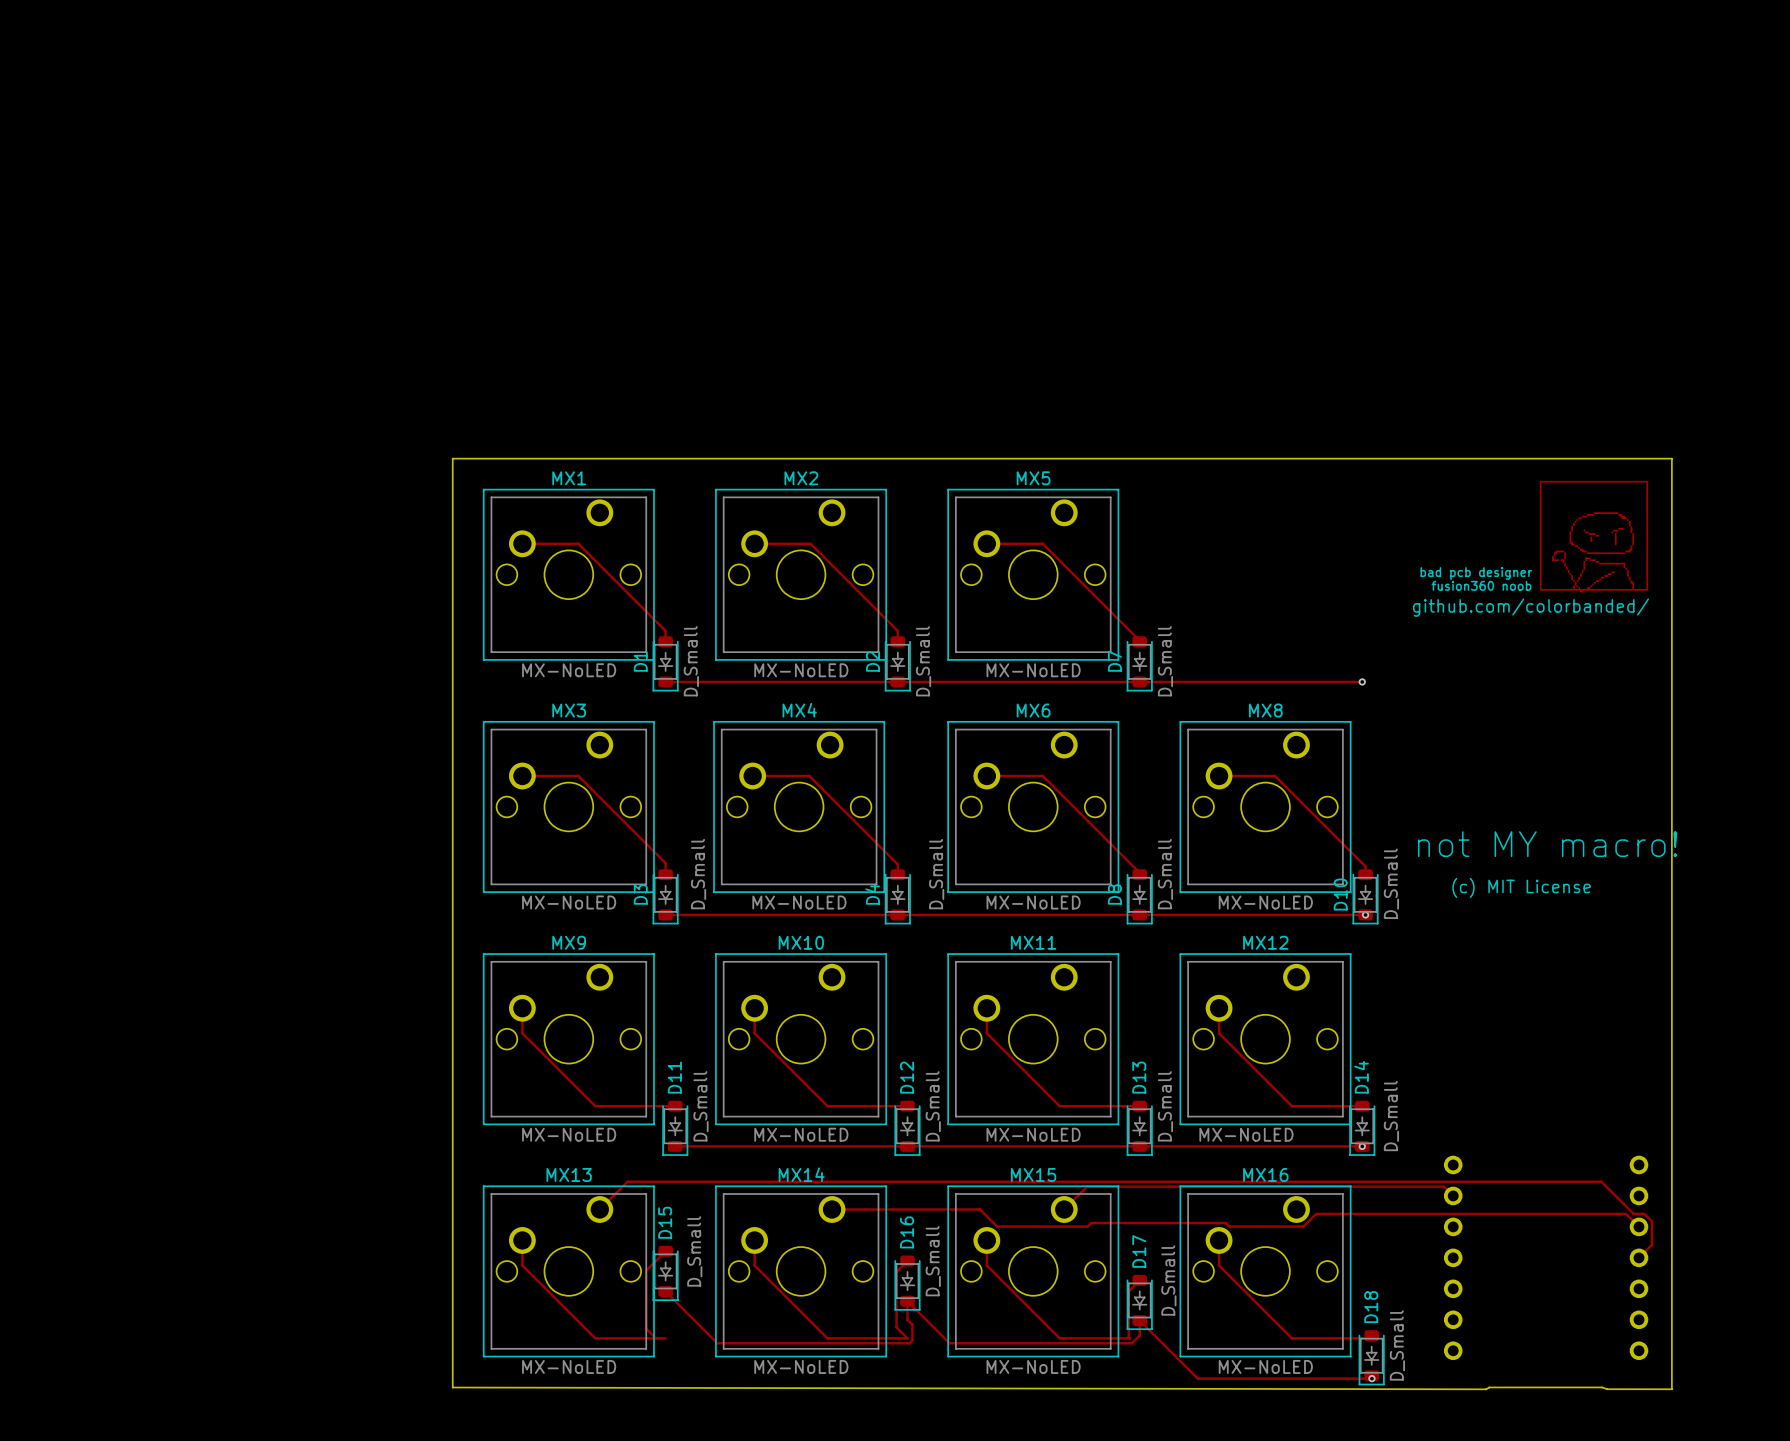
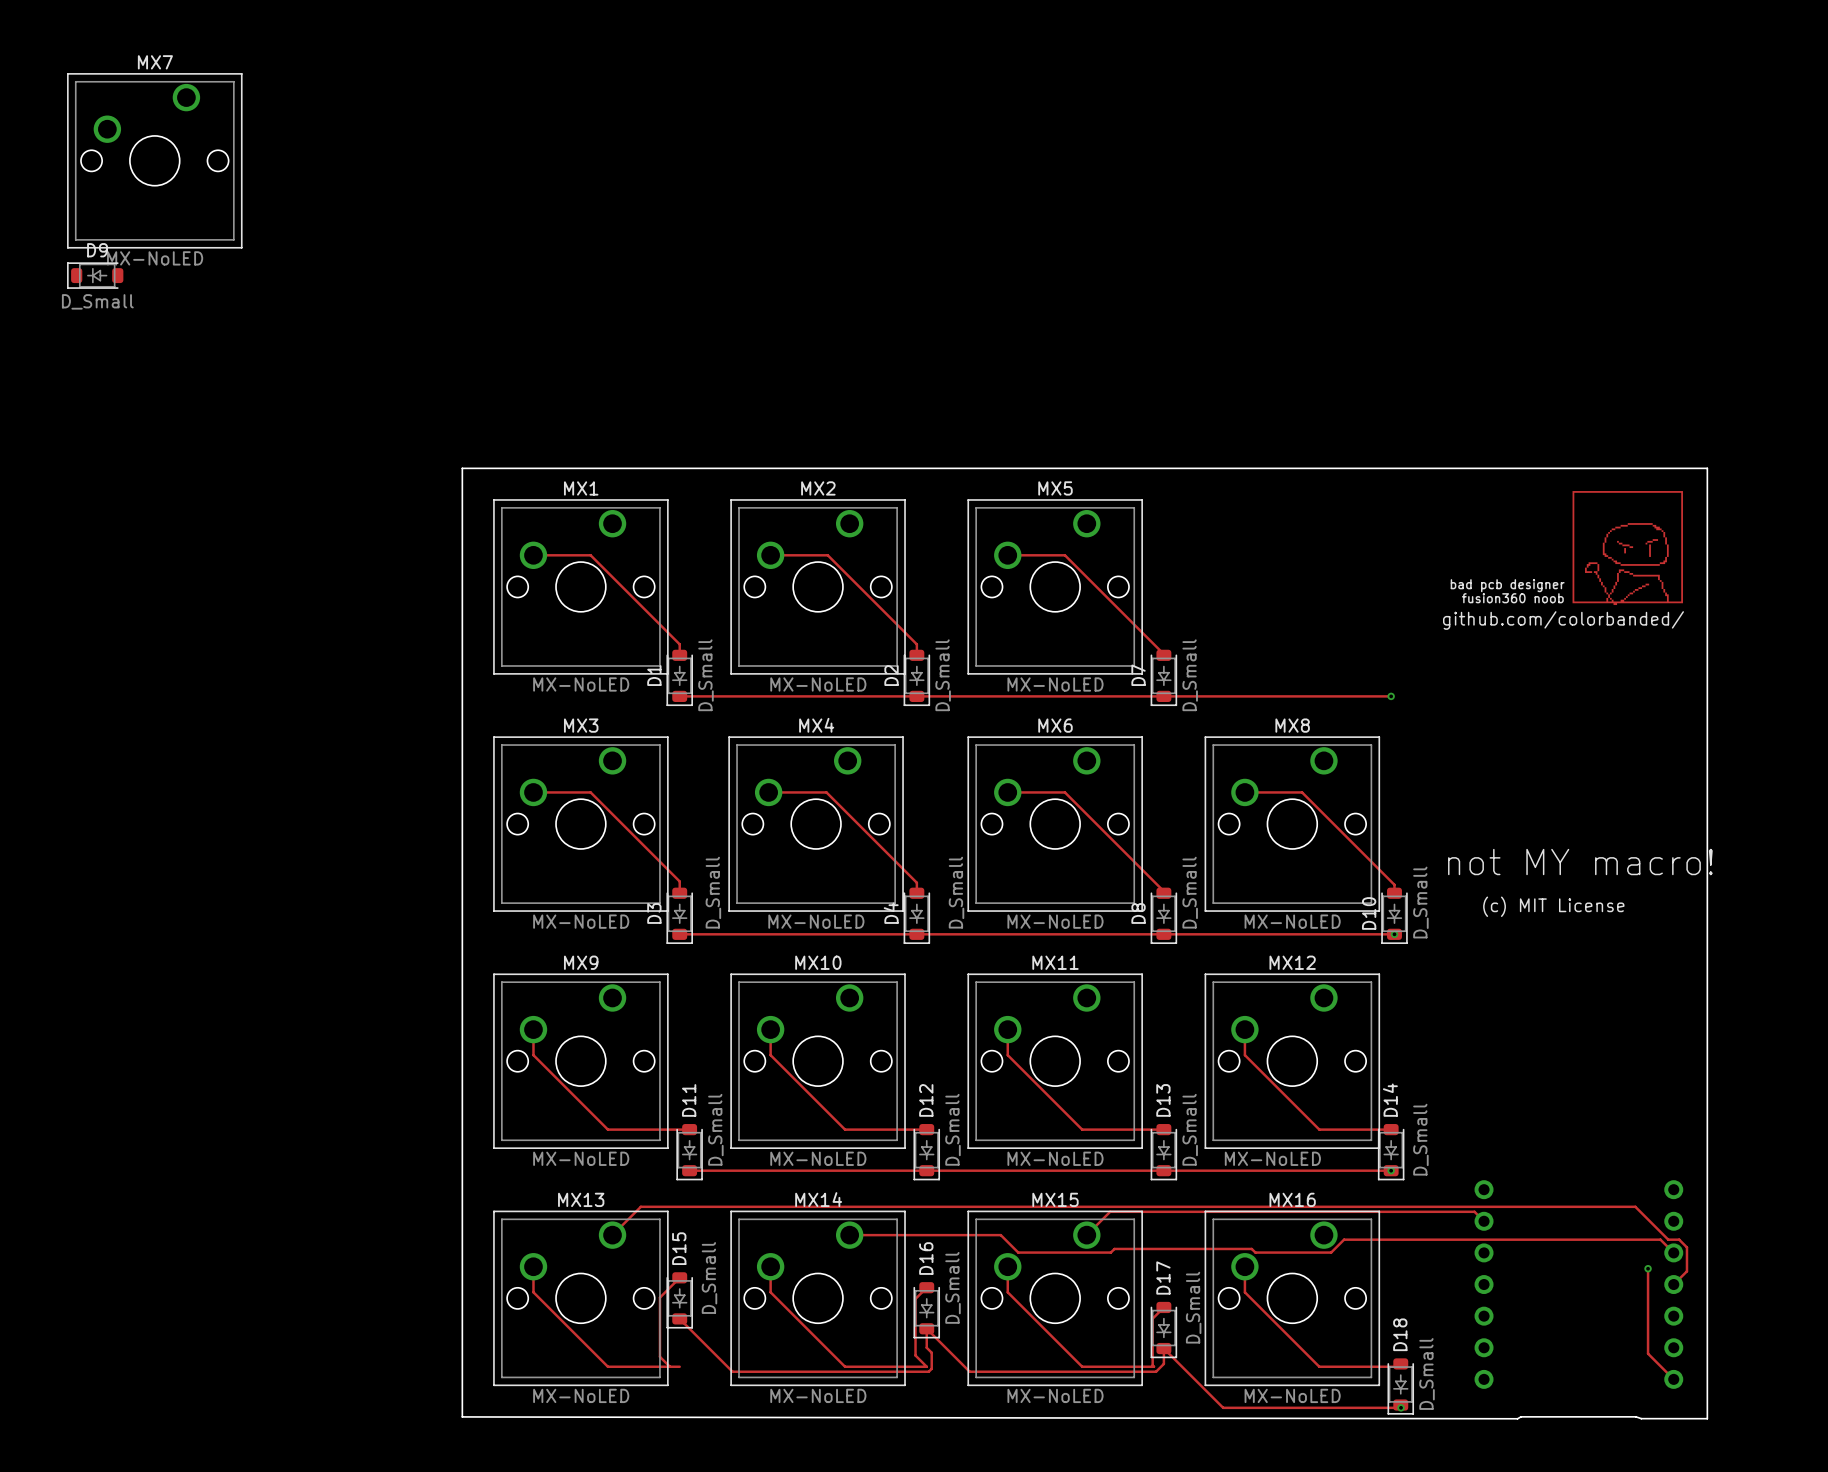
MX7: none -> MX-NoLED (154, 160)
D9: none -> D_Small (95, 275)
track: none -> (1648, 1268) (1648, 1353) (1673, 1379)
via: none -> (1648, 1268)

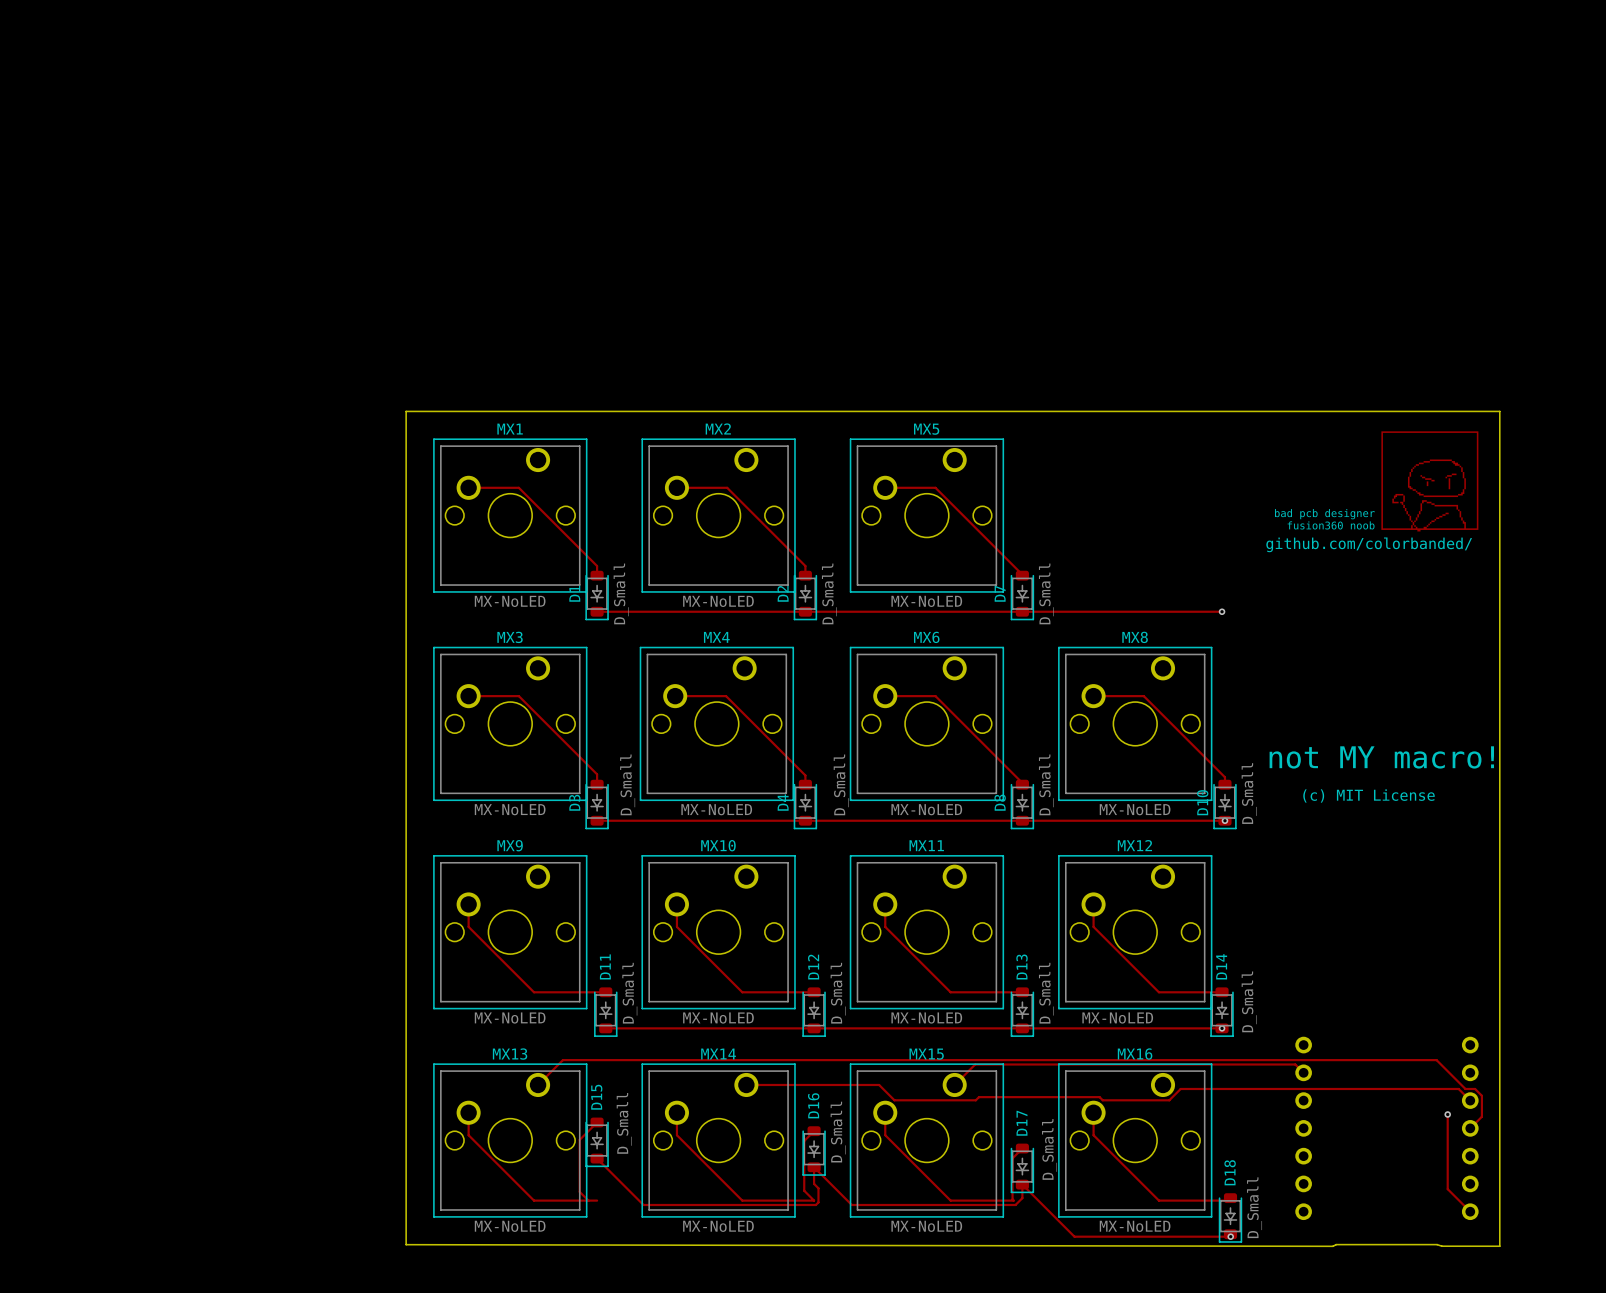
MX7: MX-NoLED (154, 160) -> none
D9: D_Small (95, 275) -> none

